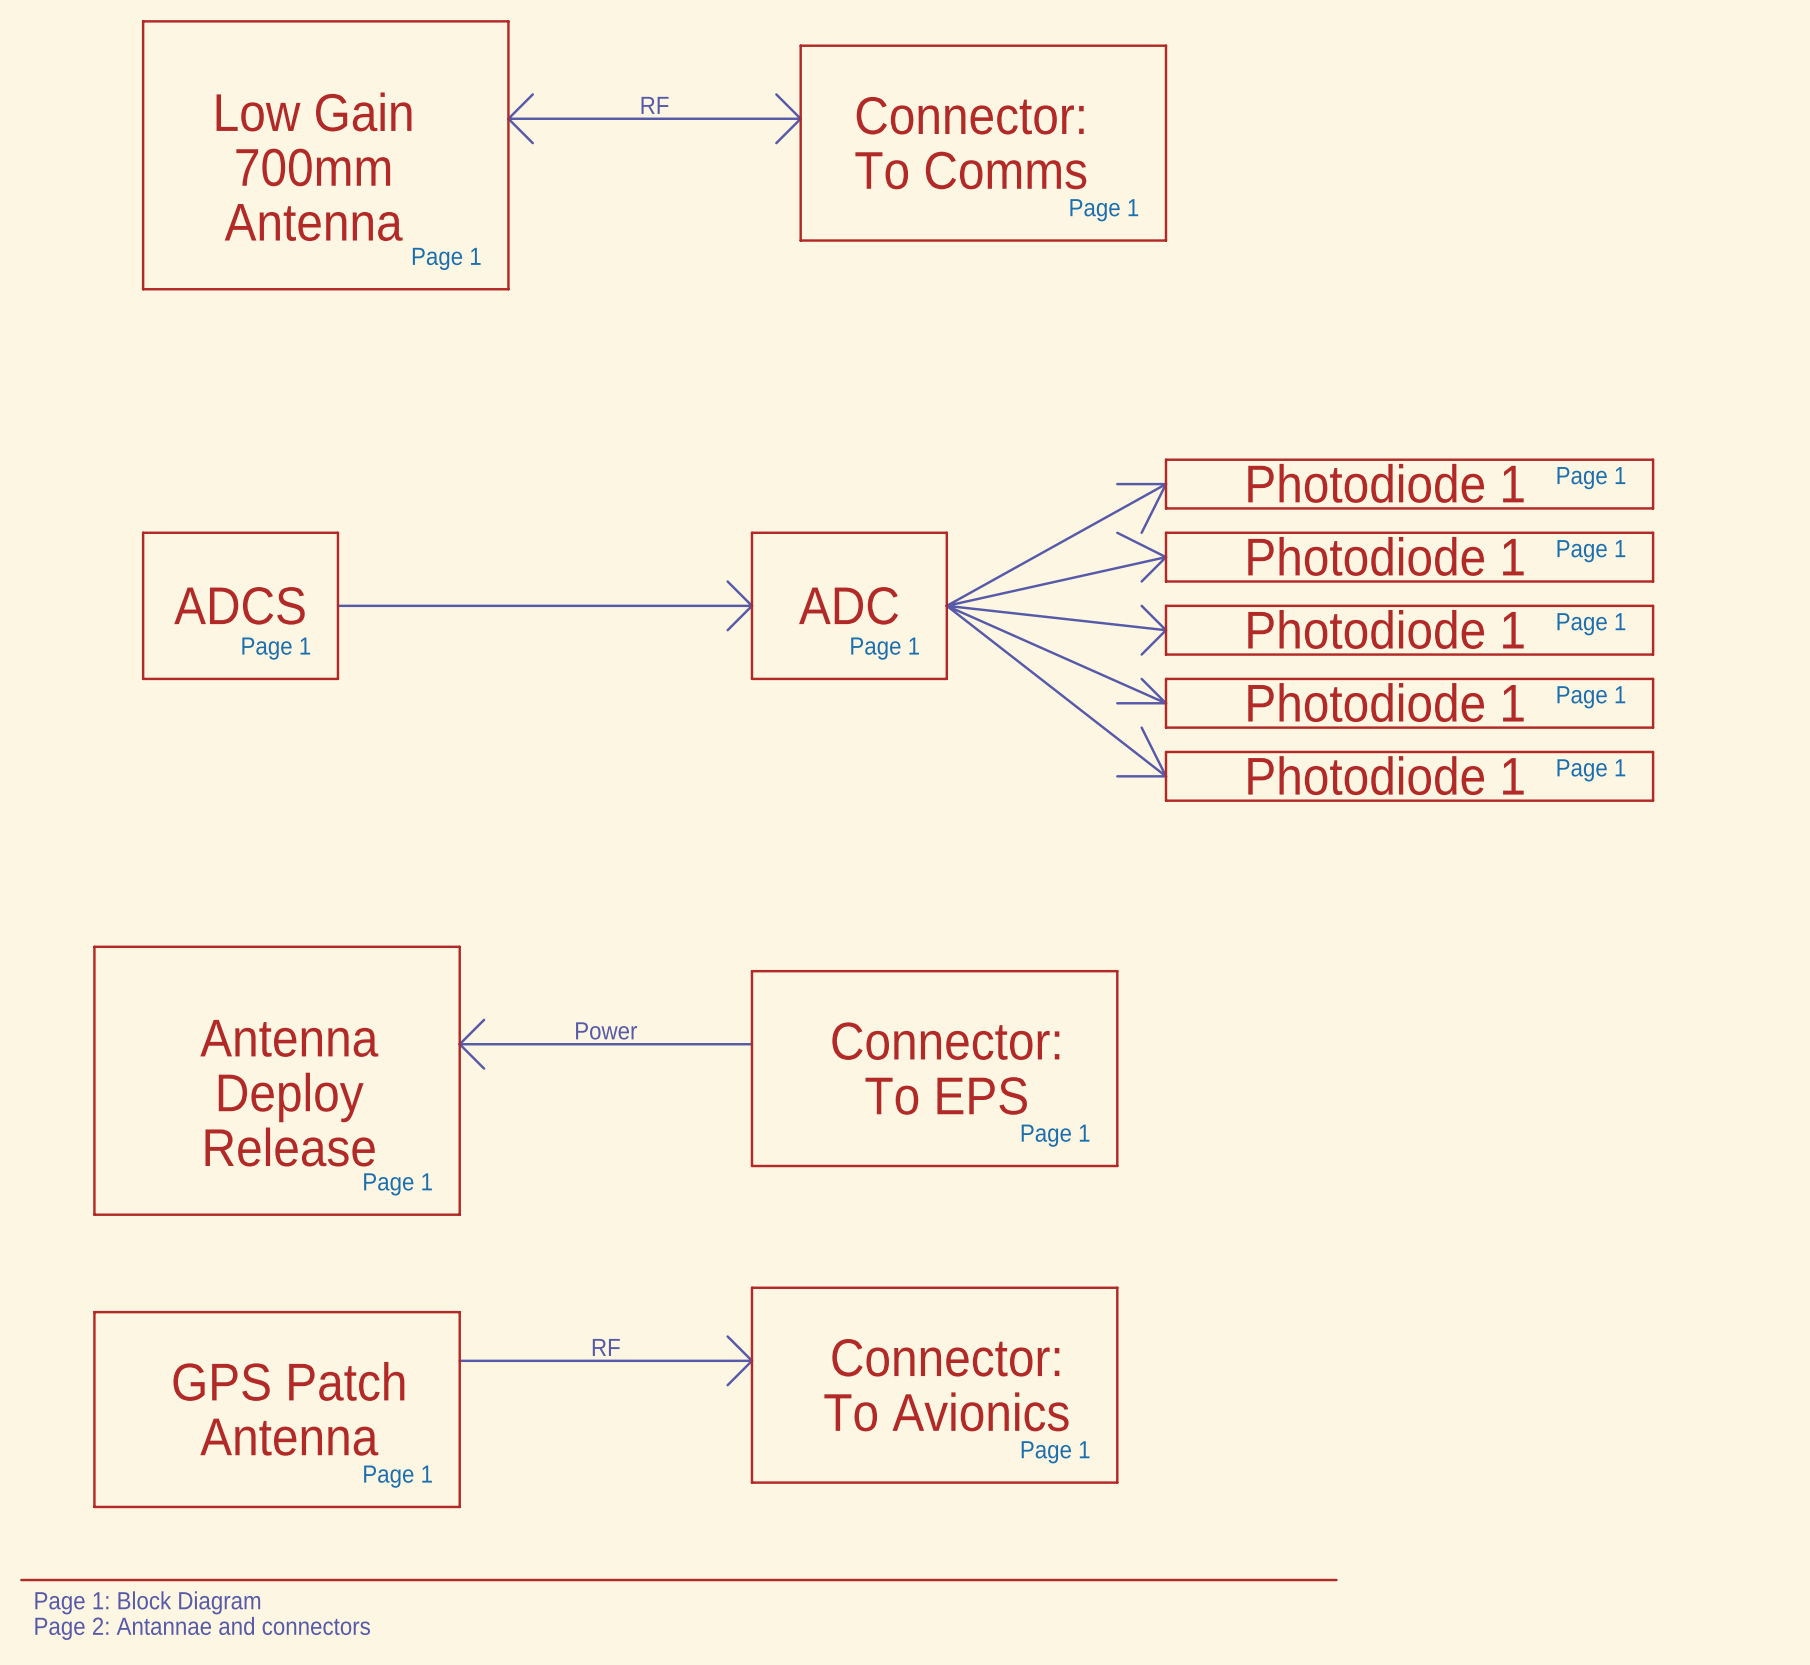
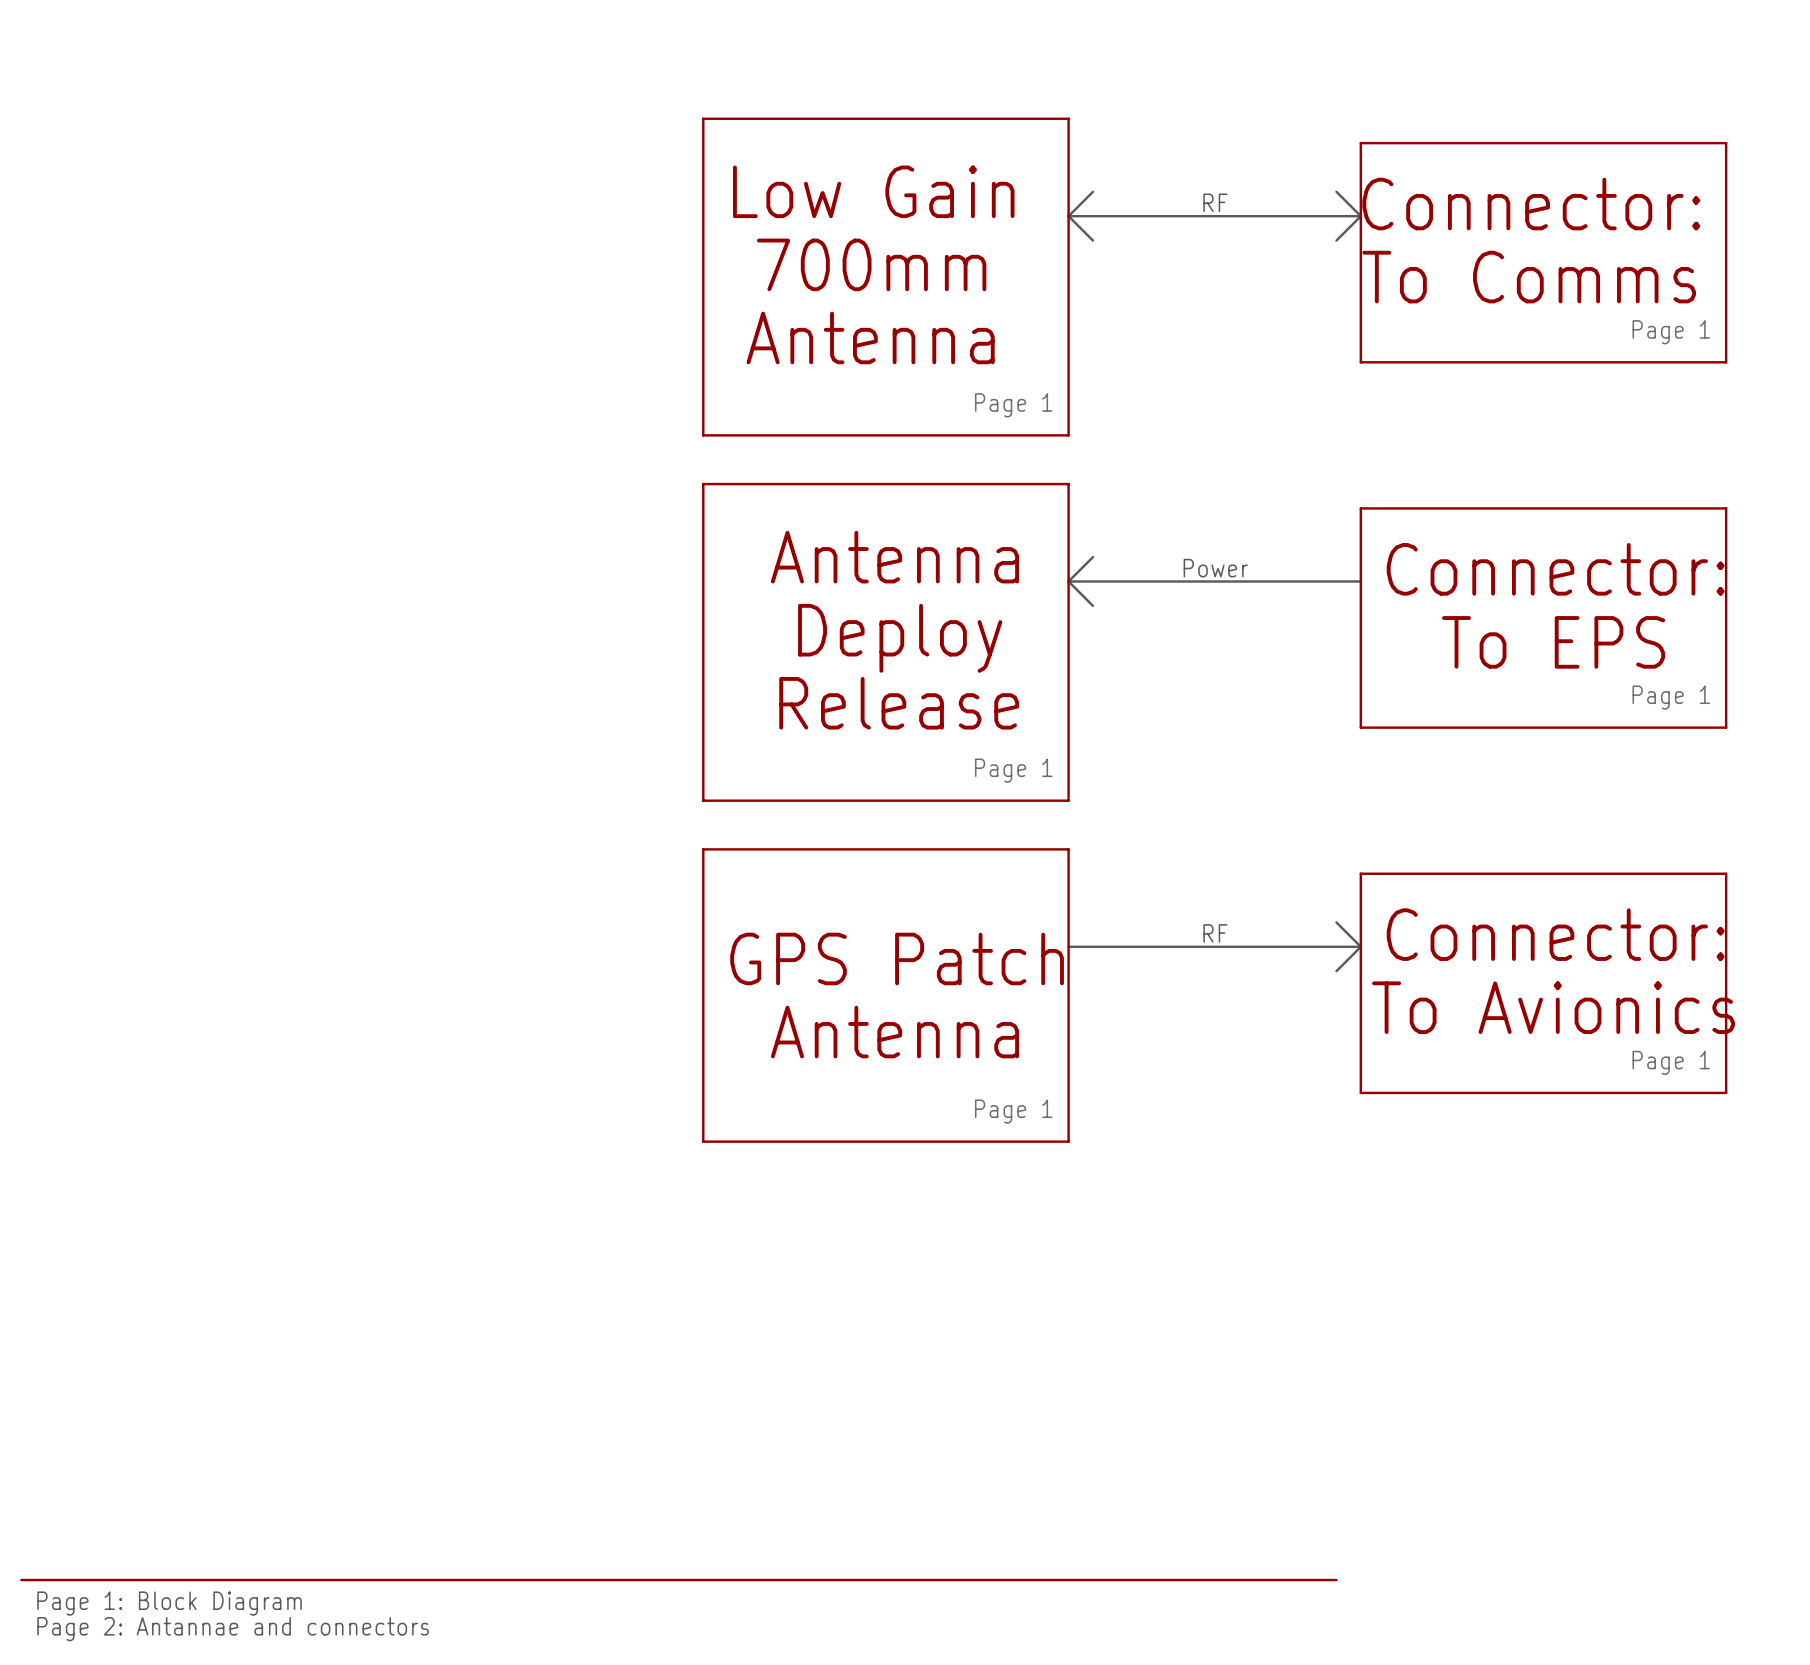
line: (143, 21) (143, 289) (508, 289) (508, 21) (143, 21) -> none
line: (800, 45) (1166, 45) (1166, 240) (800, 240) (800, 45) -> none
line: (532, 94) (508, 118) -> none
line: (776, 94) (800, 118) -> none
text: RF (655, 105) -> none
text: Low Gain (314, 111) -> none
text: Connector: (970, 115) -> none
line: (508, 118) (800, 118) -> none
line: (508, 118) (532, 143) -> none
line: none -> (703, 118) (703, 435) (1068, 435) (1068, 118) (703, 118)
line: (800, 118) (776, 143) -> none
line: none -> (1360, 143) (1726, 143) (1726, 362) (1360, 362) (1360, 143)
text: 700mm (313, 167) -> none
text: To Comms (970, 170) -> none
text: none -> Low Gain (873, 191)
line: none -> (1092, 191) (1068, 216)
line: none -> (1336, 191) (1360, 216)
text: none -> RF (1215, 202)
text: none -> Connector: (1531, 204)
text: Page 1 (1104, 210) -> none
line: none -> (1068, 216) (1360, 216)
line: none -> (1068, 216) (1092, 240)
line: none -> (1360, 216) (1336, 240)
text: Antenna (313, 222) -> none
text: Page 1 (446, 258) -> none
text: none -> 700mm (871, 264)
text: none -> To Comms (1529, 277)
text: none -> Page 1 (1671, 332)
text: none -> Antenna (870, 337)
text: none -> Page 1 (1013, 405)
text: Page 1 (1591, 478) -> none
text: Photodiode 1 (1385, 483) -> none
line: none -> (703, 484) (703, 800) (1068, 800) (1068, 484) (703, 484)
line: (1117, 484) (1166, 484) -> none
line: (1166, 484) (946, 605) -> none
line: (1166, 484) (1141, 532) -> none
line: (1360, 508) (1166, 508) (1166, 459) (1653, 459) (1653, 508) -> (1360, 508) (1360, 727)
line: (143, 532) (143, 678) (337, 678) (337, 532) (143, 532) -> none
line: (751, 532) (751, 678) (946, 678) (946, 532) (751, 532) -> none
line: (1117, 532) (1166, 557) -> none
line: (1166, 532) (1166, 581) (1653, 581) (1653, 532) (1166, 532) -> none
text: Page 1 (1591, 551) -> none
text: Photodiode 1 (1385, 556) -> none
text: none -> Antenna (894, 557)
line: (1166, 557) (1141, 581) -> (1092, 557) (1068, 581)
line: (1166, 557) (946, 605) -> none
text: none -> Power (1215, 568)
text: none -> Connector: (1555, 569)
line: (727, 581) (751, 605) -> none
line: none -> (1068, 581) (1360, 581)
text: ADCS (239, 605) -> none
line: (337, 605) (751, 605) -> none
line: (751, 605) (727, 630) -> none
text: ADC (848, 605) -> none
line: (946, 605) (1166, 630) -> none
line: (946, 605) (1166, 703) -> none
line: (946, 605) (1166, 776) -> none
line: (1141, 605) (1166, 630) -> (1068, 581) (1092, 605)
line: (1166, 605) (1166, 654) (1653, 654) (1653, 605) (1166, 605) -> none
text: Page 1 (1591, 624) -> none
text: Photodiode 1 (1385, 629) -> none
line: (1166, 630) (1141, 654) -> none
text: none -> Deploy (900, 638)
text: none -> To EPS (1553, 642)
text: Page 1 (276, 648) -> none
text: Page 1 (885, 648) -> none
line: (1141, 678) (1166, 703) -> none
text position: Page 1 (1591, 697) -> Page 1 (1671, 697)
text: none -> Release (899, 703)
text: Photodiode 1 (1385, 702) -> none
line: (1117, 703) (1166, 703) -> none
line: (1141, 727) (1166, 776) -> none
line: (1360, 727) (1166, 727) (1166, 678) (1653, 678) (1653, 727) -> (1653, 508) (1726, 508) (1726, 727) (1653, 727)
line: (1166, 751) (1166, 800) (1653, 800) (1653, 751) (1166, 751) -> none
text: none -> Page 1 (1013, 770)
text: Page 1 (1591, 770) -> none
text: Photodiode 1 (1385, 775) -> none
line: (1117, 776) (1166, 776) -> none
line: none -> (703, 849) (703, 1141) (1068, 1141) (1068, 849) (703, 849)
line: none -> (1360, 873) (1360, 1092) (1726, 1092) (1726, 873) (1360, 873)
line: none -> (1336, 922) (1360, 946)
text: none -> RF (1215, 933)
text: none -> Connector: (1555, 934)
line: (94, 946) (94, 1214) (459, 1214) (459, 946) (94, 946) -> none
line: none -> (1068, 946) (1360, 946)
line: none -> (1360, 946) (1336, 971)
text: none -> GPS Patch (897, 958)
line: (751, 971) (751, 1166) (1117, 1166) (1117, 971) (751, 971) -> none
text: none -> To Avionics (1553, 1007)
line: (484, 1019) (459, 1044) -> none
text: Power (606, 1030) -> none
text: none -> Antenna (894, 1032)
text: Antenna (289, 1038) -> none
text: Connector: (945, 1041) -> none
line: (459, 1044) (751, 1044) -> none
line: (459, 1044) (484, 1068) -> none
text: none -> Page 1 (1671, 1062)
text: To EPS (946, 1095) -> none
text: Deploy (291, 1097) -> none
text position: Page 1 (1055, 1135) -> Page 1 (1013, 1111)
text: Release (290, 1147) -> none
text: Page 1 (398, 1184) -> none
line: (751, 1287) (751, 1482) (1117, 1482) (1117, 1287) (751, 1287) -> none
line: (94, 1312) (459, 1312) (459, 1506) (94, 1506) (94, 1312) -> none
line: (727, 1336) (751, 1360) -> none
text: RF (606, 1347) -> none
text: Connector: (945, 1357) -> none
line: (459, 1360) (751, 1360) -> none
line: (751, 1360) (727, 1385) -> none
text: GPS Patch (288, 1381) -> none
text: To Avionics (946, 1411) -> none
text: Antenna (289, 1437) -> none
text: Page 1 (1055, 1452) -> none
text: Page 1 (398, 1476) -> none

